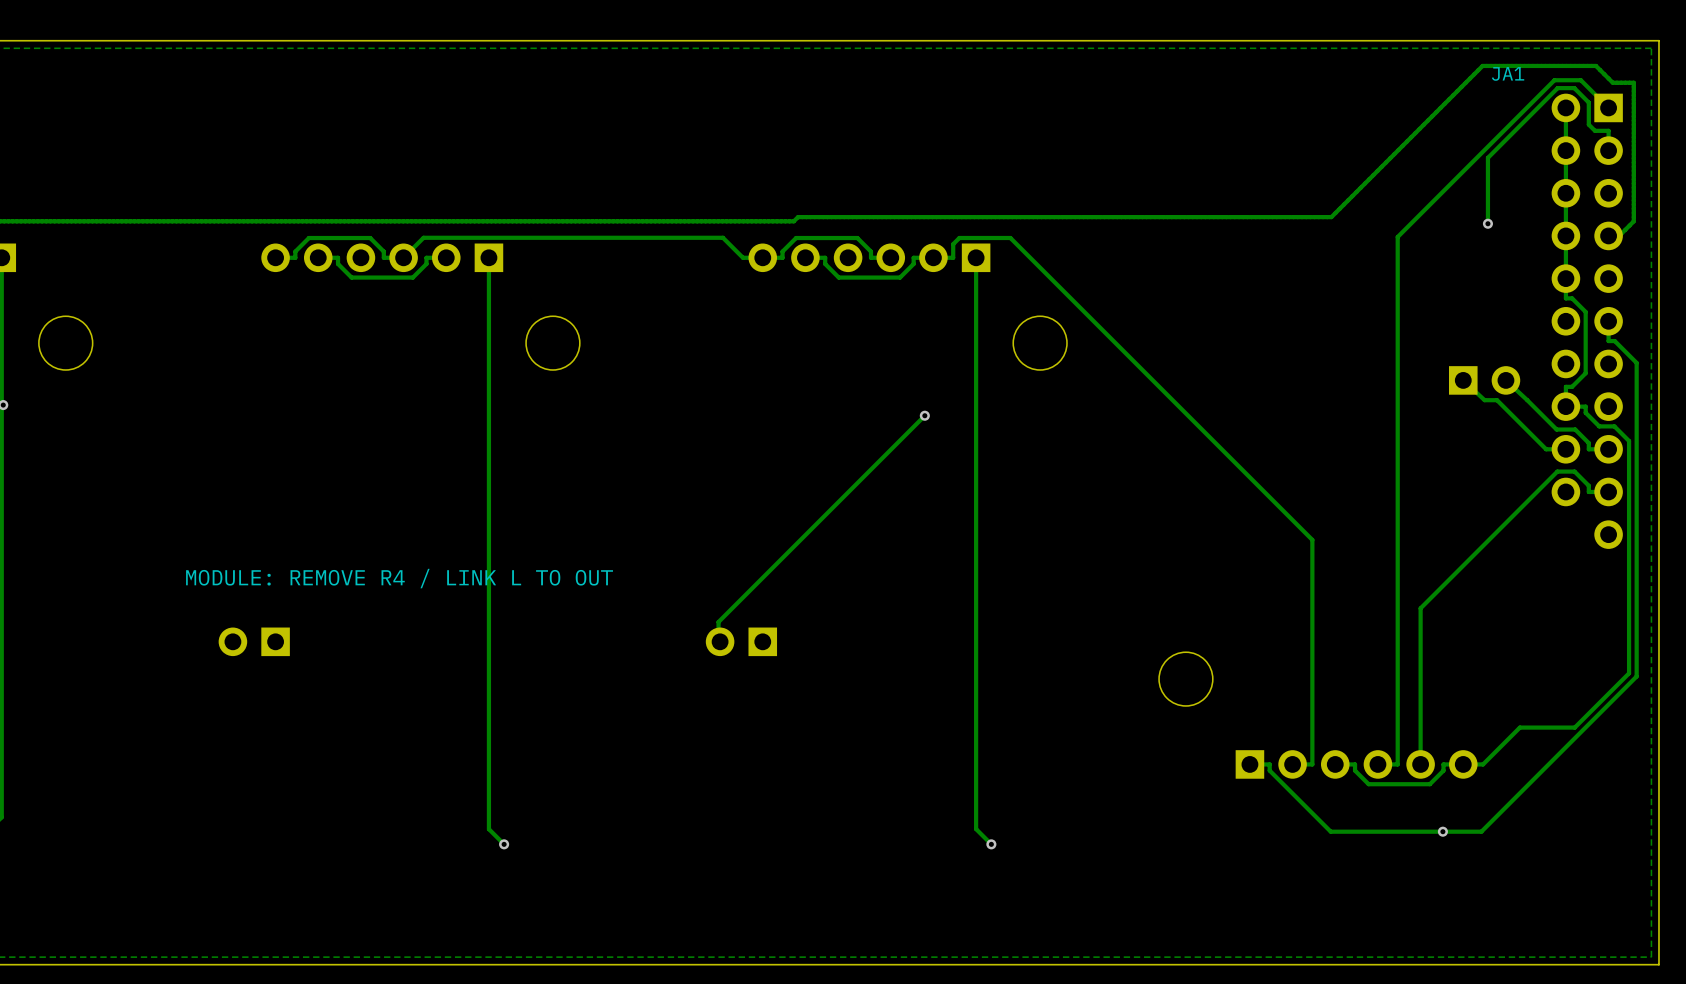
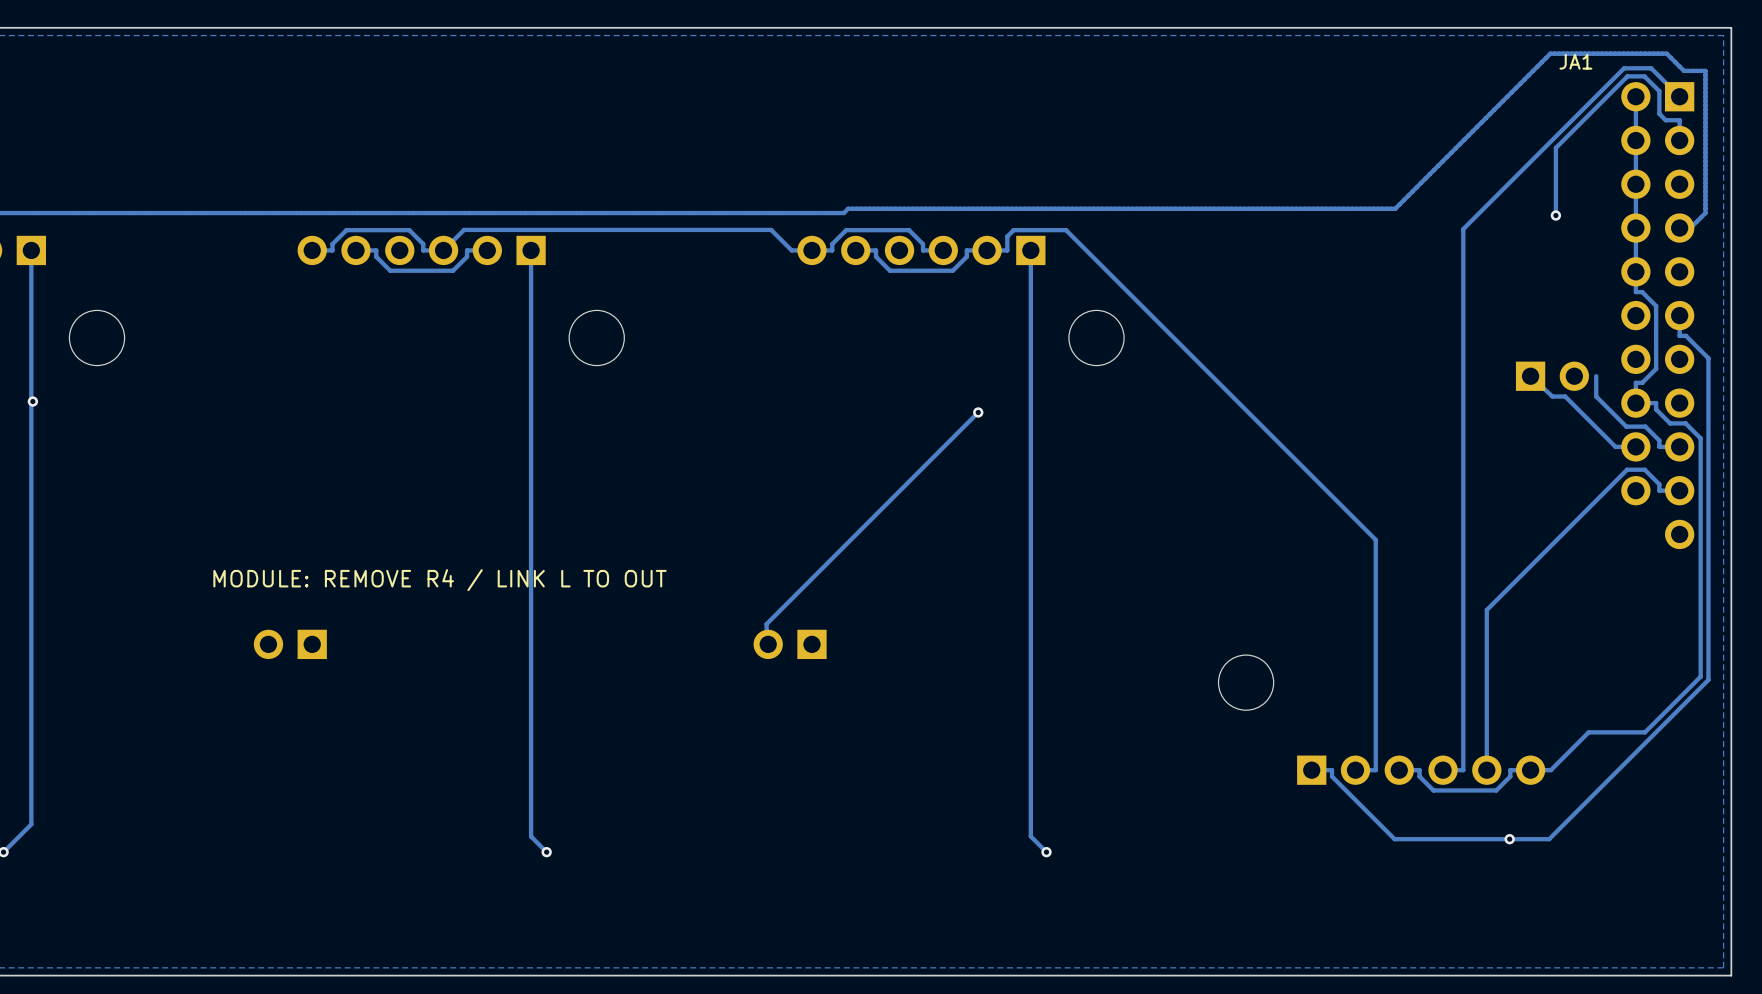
track: (1505, 380) (1527, 400) -> (1596, 376) (1596, 396)

